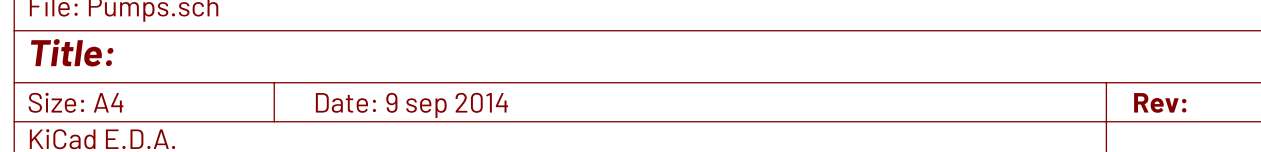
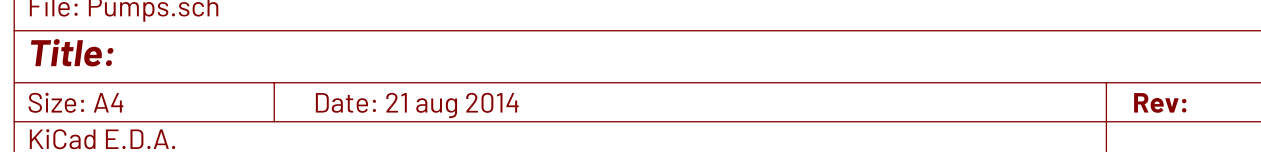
title block: Date: 9 sep 2014 (411, 105) -> Date: 21 aug 2014 (417, 105)

